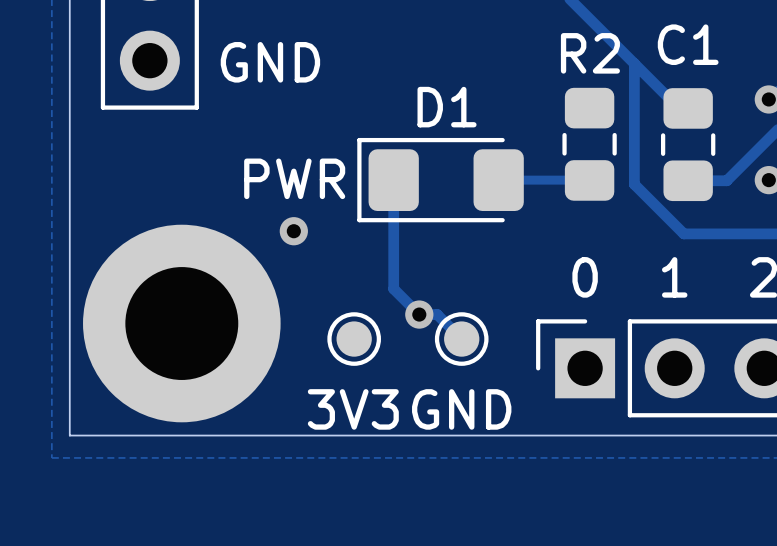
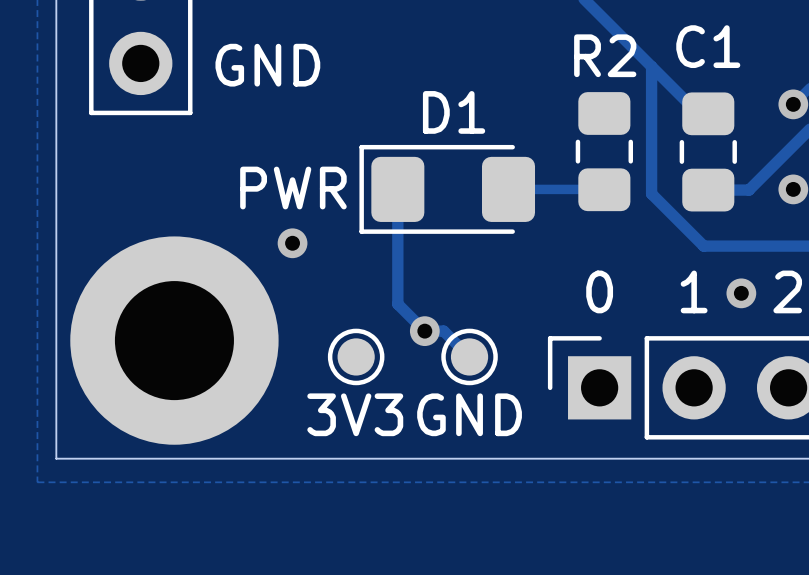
via: none -> (741, 293)
text position: 3V3 (353, 409) -> 3V3 (355, 414)
text position: GND (461, 409) -> GND (469, 414)

